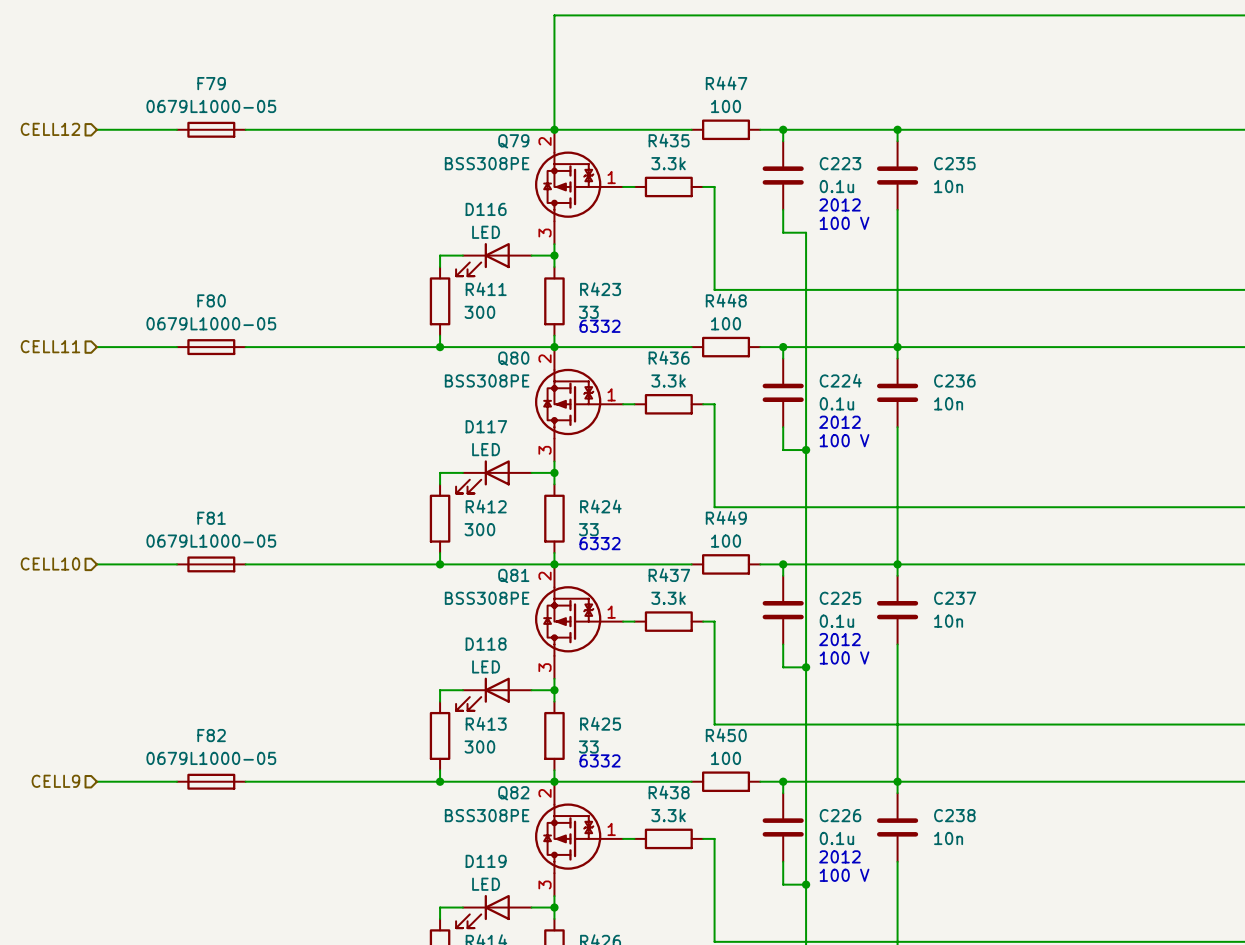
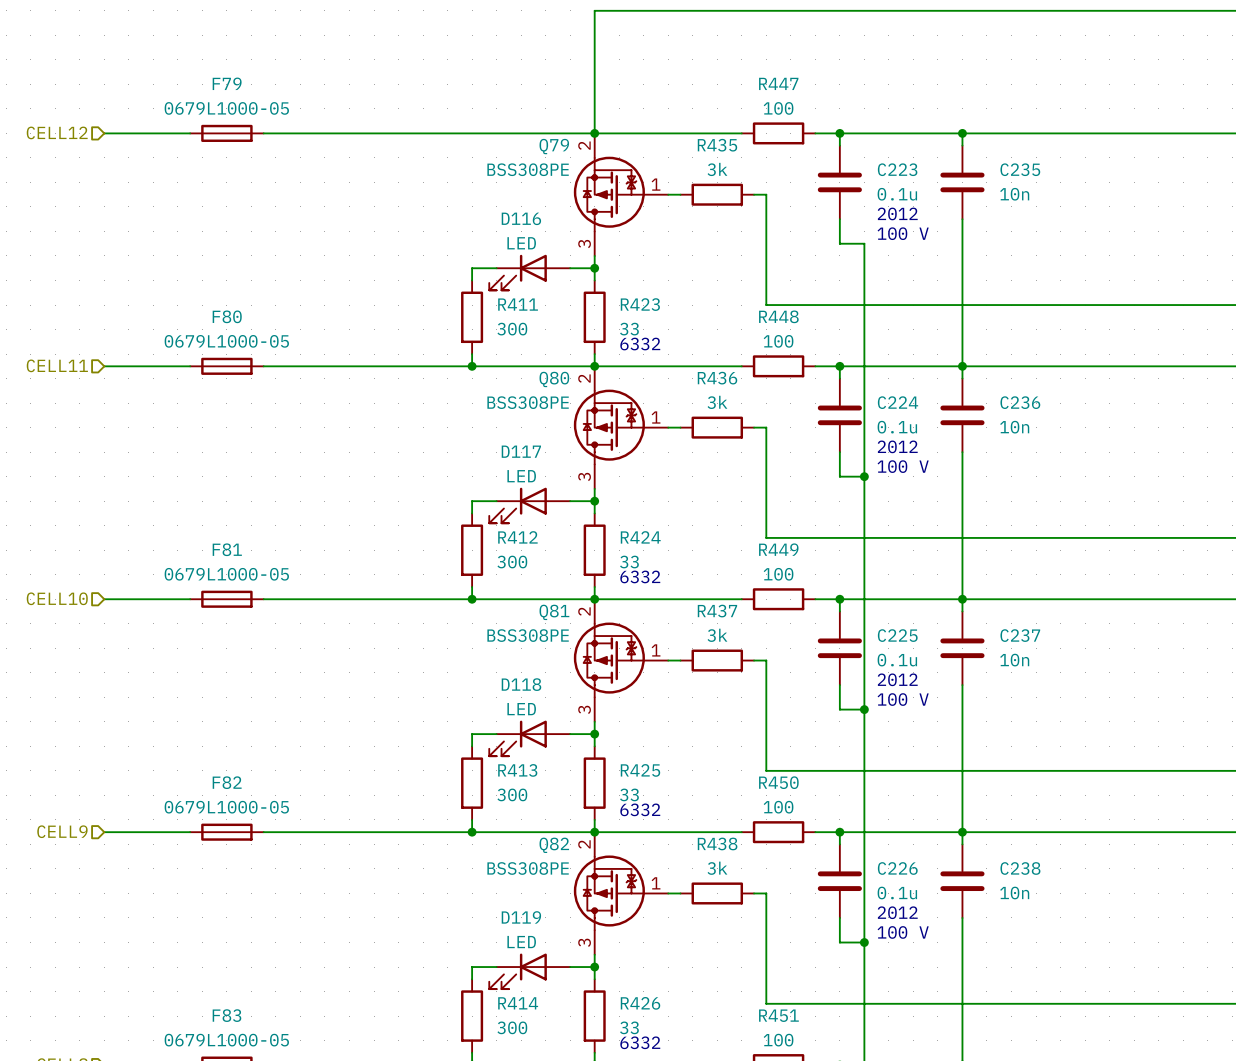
R435 value: 3.3k (668, 163) -> 3k (717, 169)
R436 value: 3.3k (668, 380) -> 3k (717, 402)
R437 value: 3.3k (668, 598) -> 3k (717, 635)
R438 value: 3.3k (668, 815) -> 3k (717, 868)

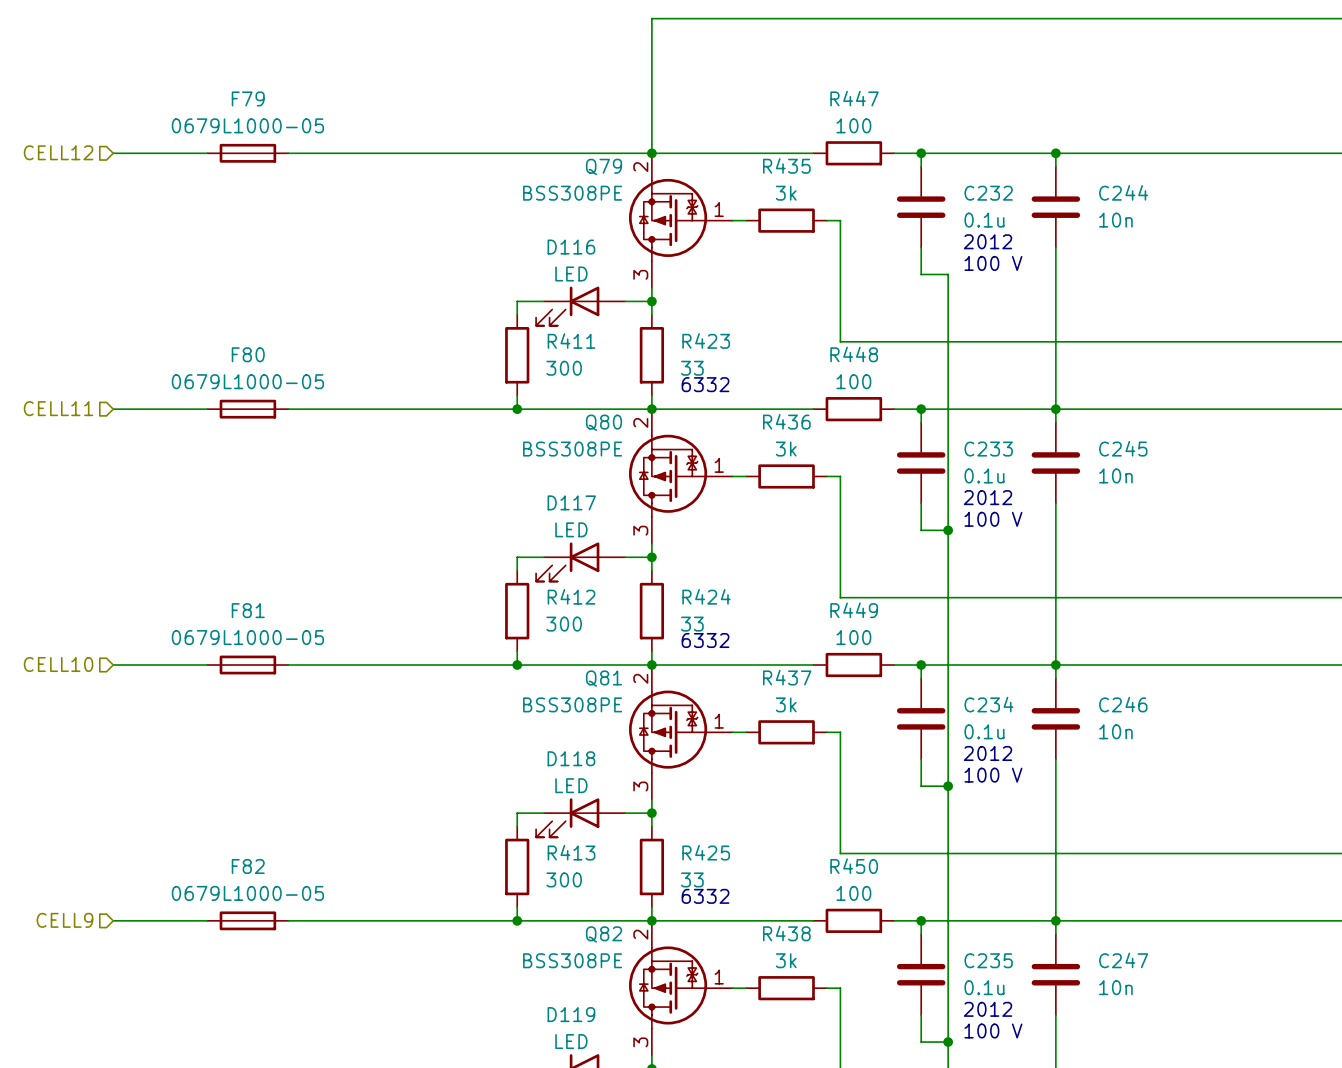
C223 name: C223 (897, 169) -> C232 (988, 193)
C235 name: C235 (1020, 169) -> C244 (1123, 192)
C224 name: C224 (898, 402) -> C233 (988, 449)
C236 name: C236 (1020, 402) -> C245 (1123, 448)
C225 name: C225 (897, 635) -> C234 (988, 704)
C237 name: C237 (1020, 635) -> C246 (1123, 704)
C226 name: C226 (897, 868) -> C235 (988, 960)
C238 name: C238 (1020, 868) -> C247 (1123, 960)

